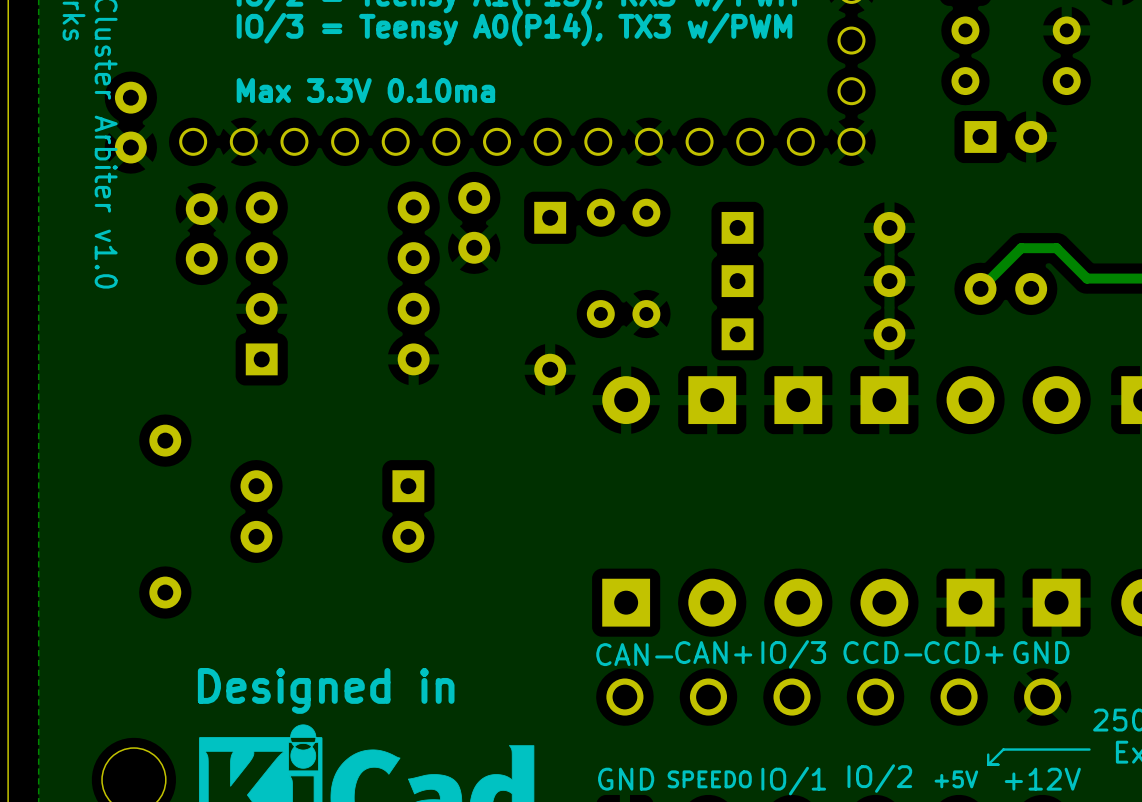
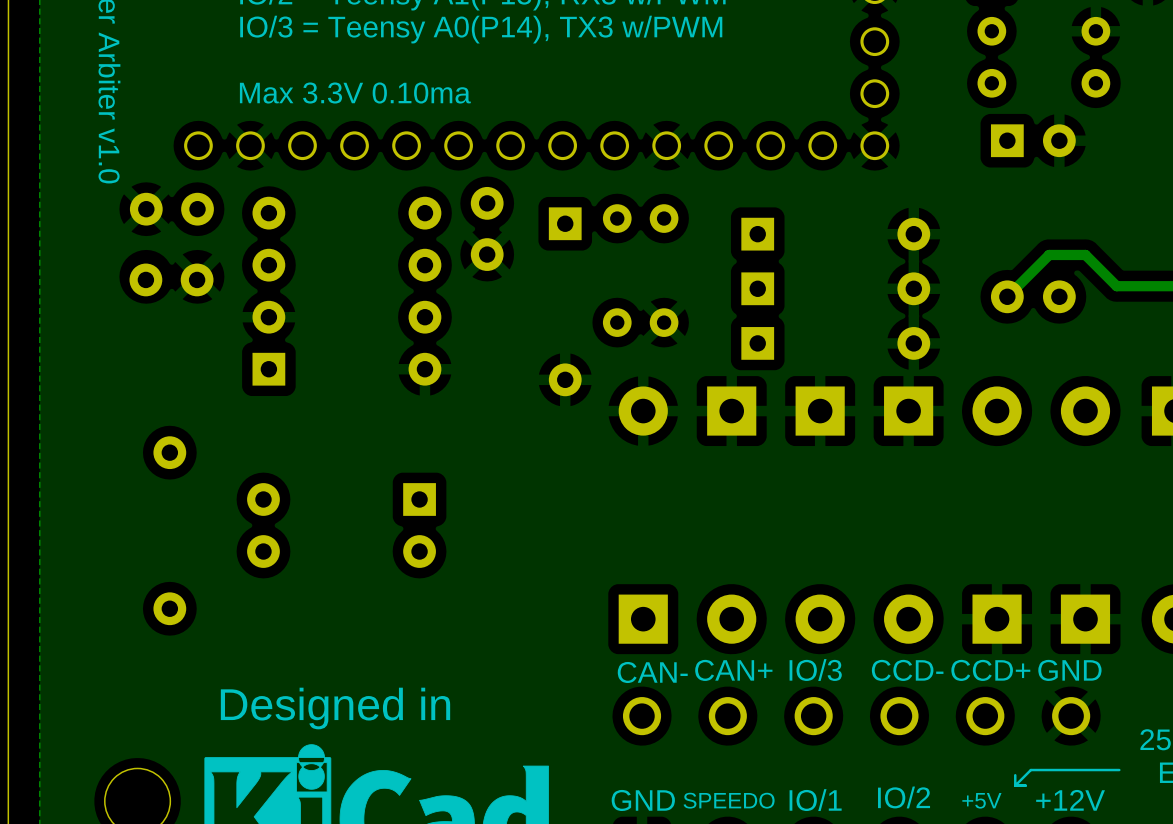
part: (130, 122) -> none
part: none -> (171, 209)
part: (201, 234) -> none
part: none -> (171, 279)

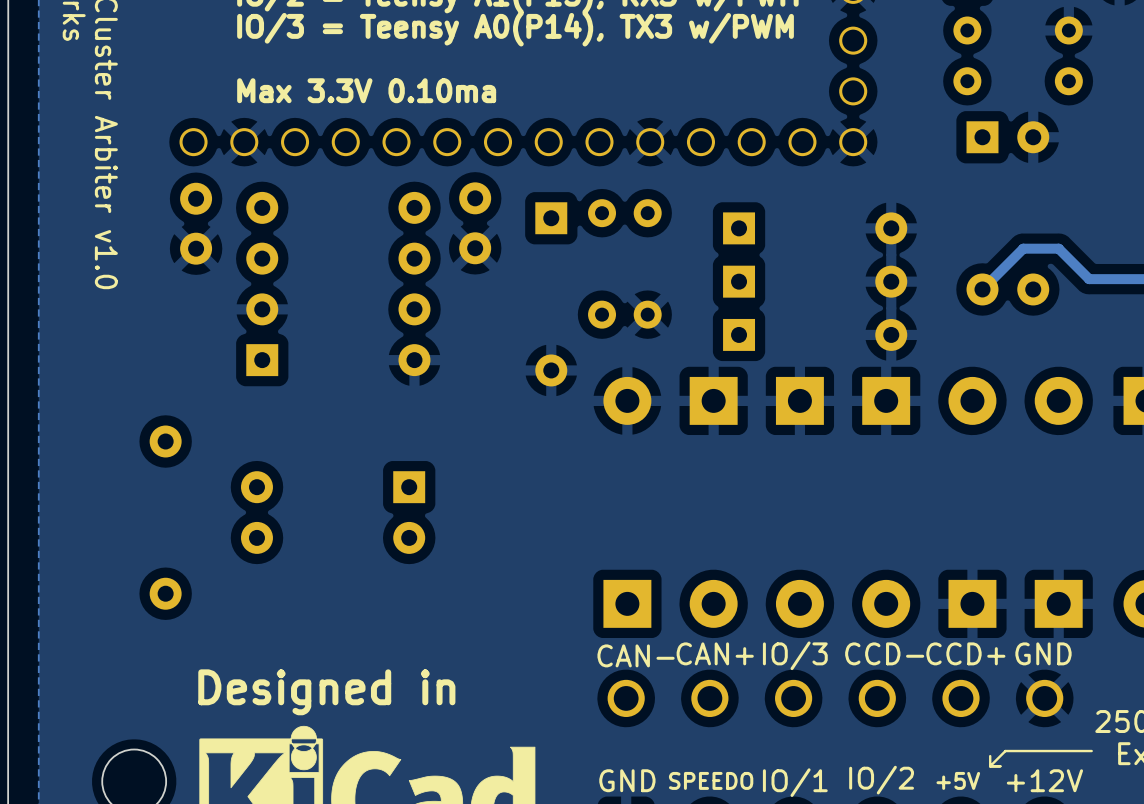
part: (171, 209) -> none
part: none -> (196, 223)
part: (171, 279) -> none

